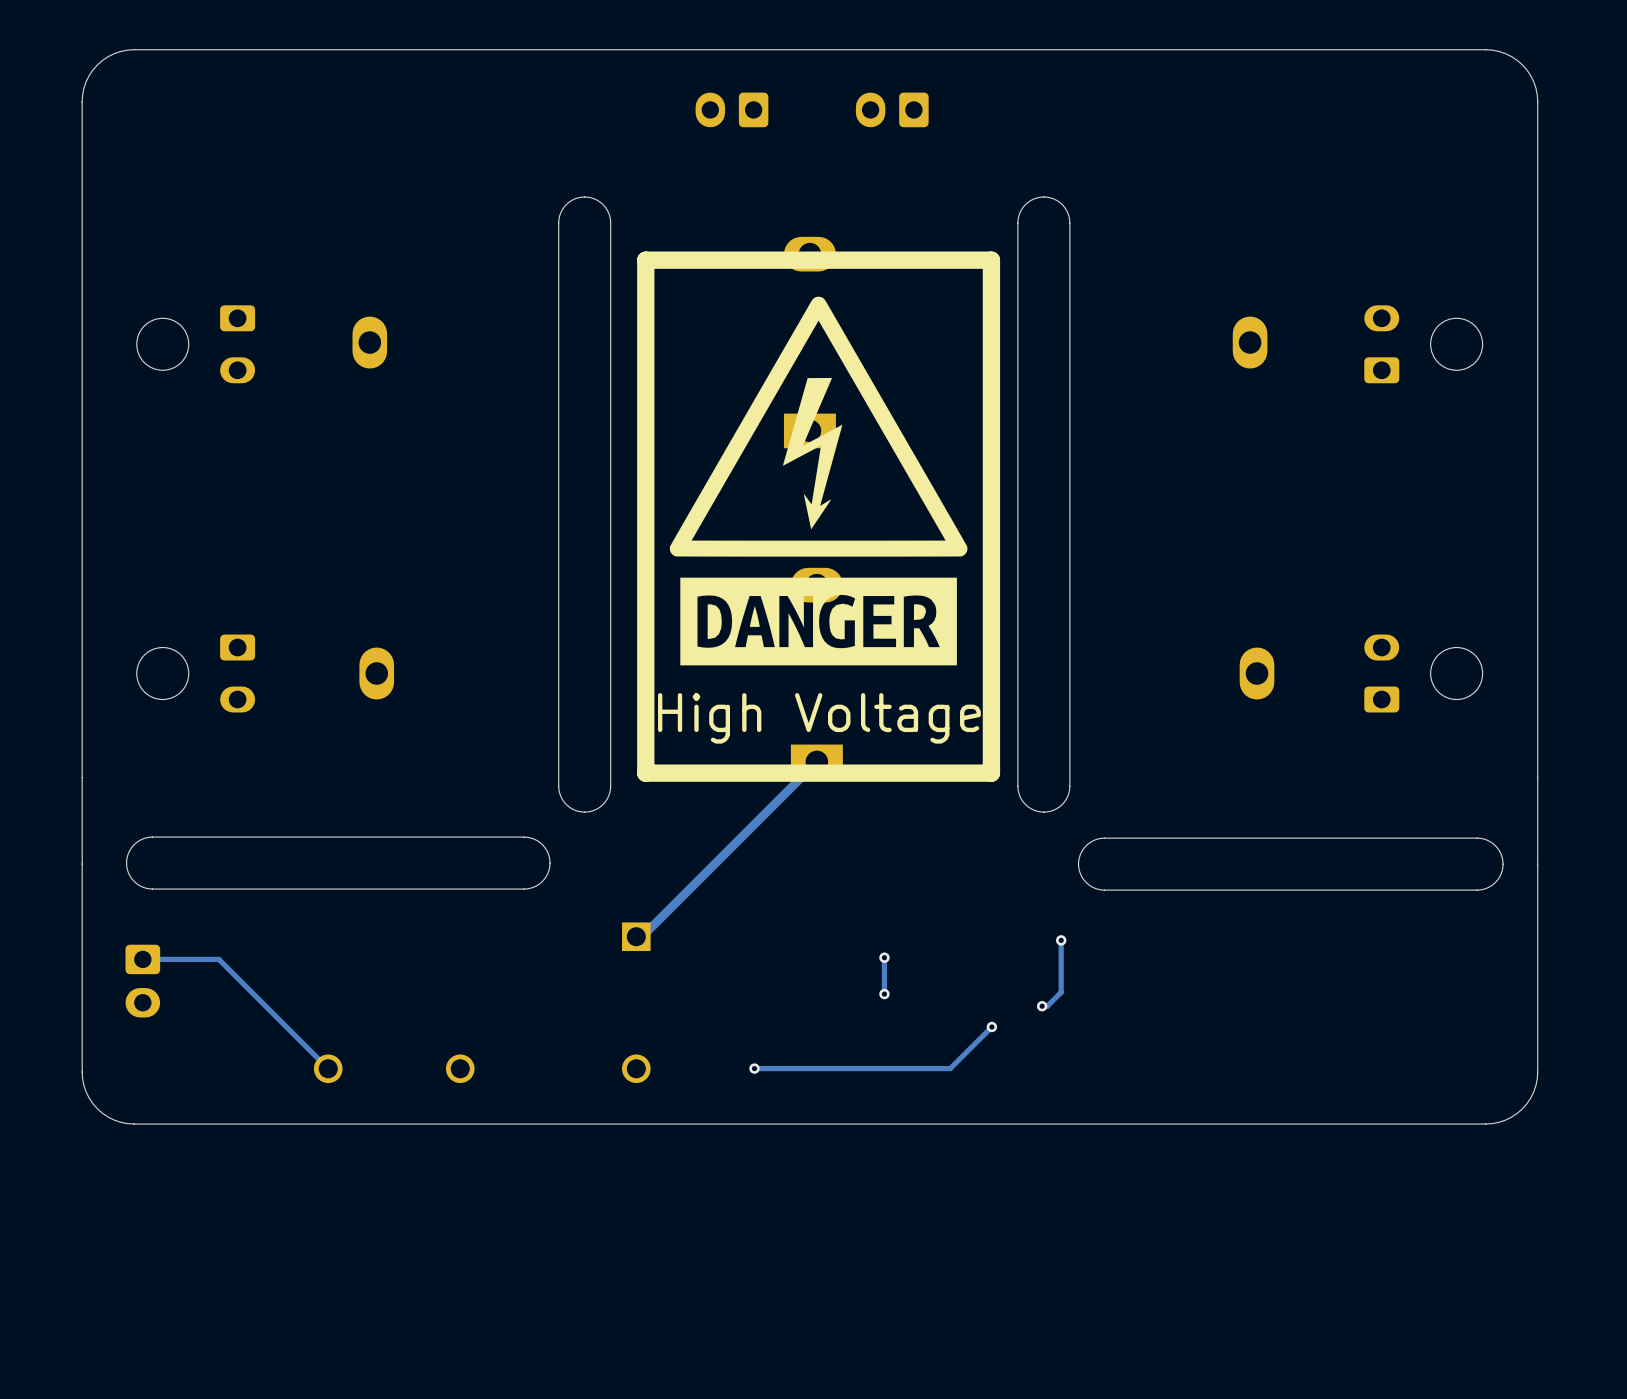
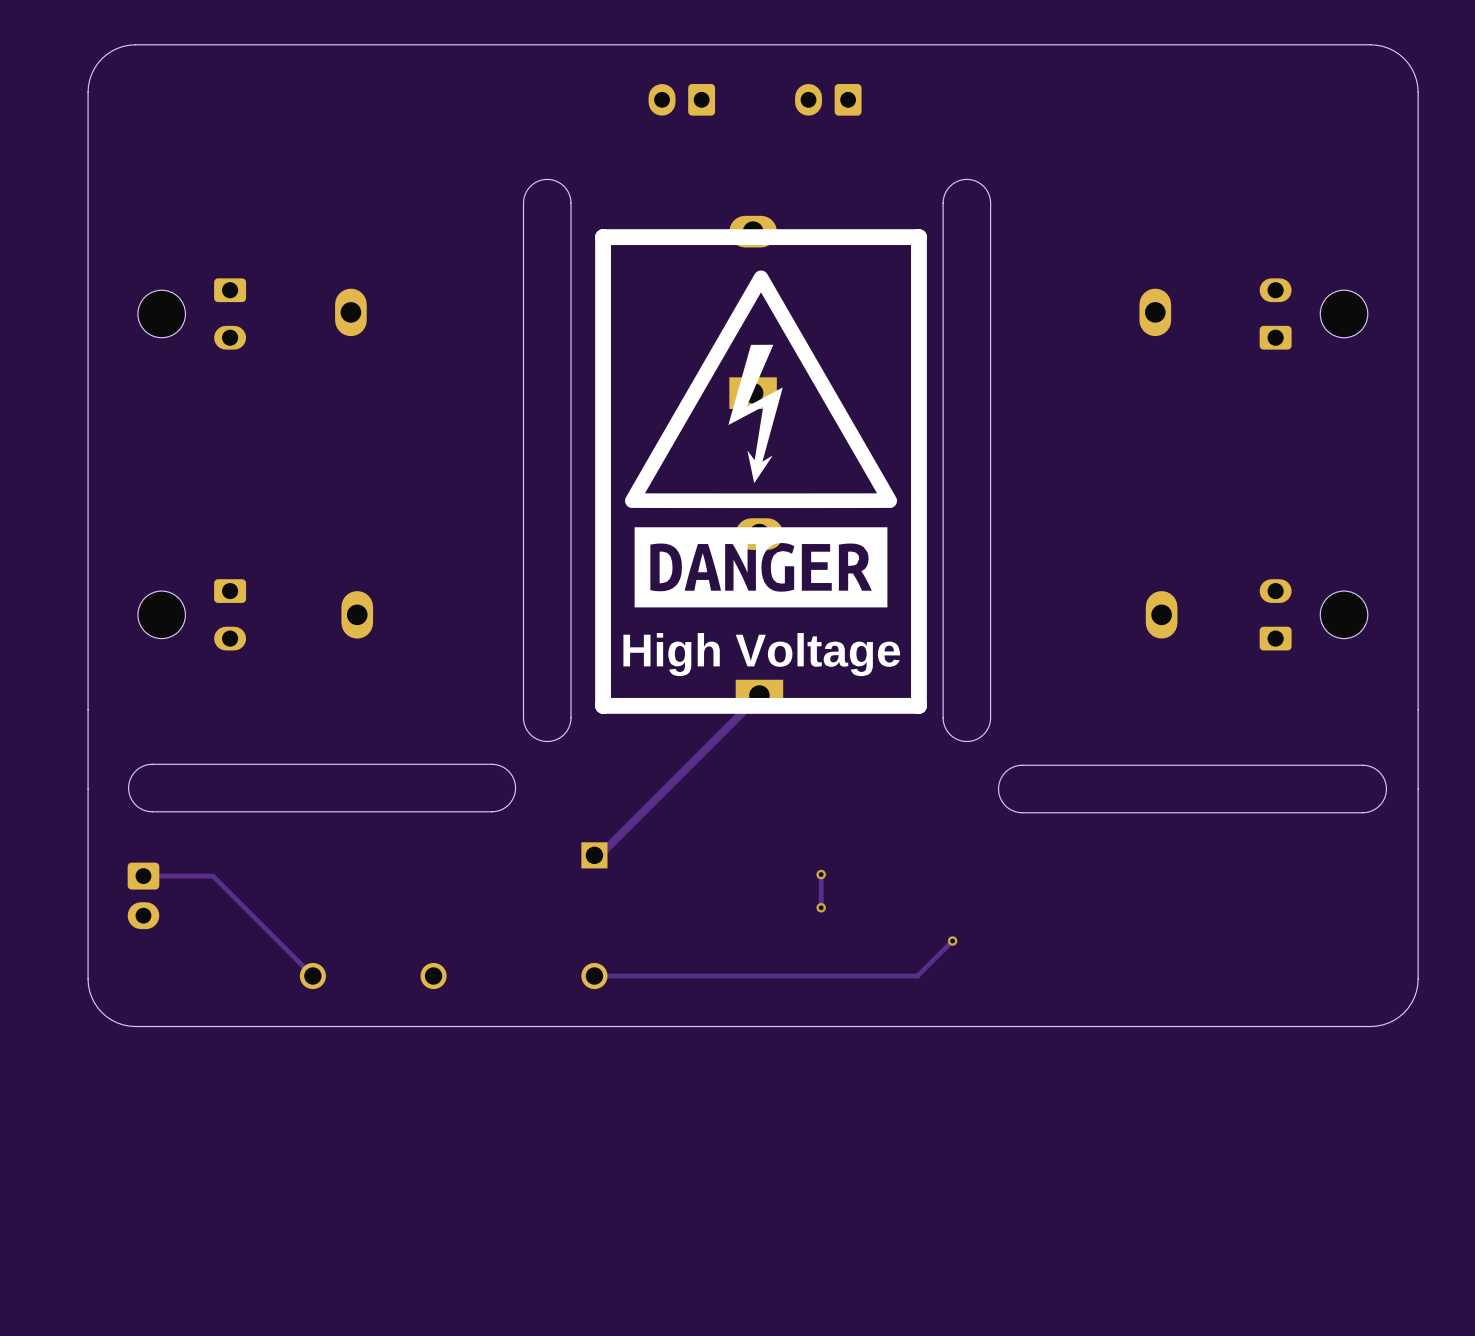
track: (1061, 940) (1061, 992) (1047, 1006) (1042, 1006) -> none
via: (1061, 940) -> none
via: (1042, 1006) -> none
track: (991, 1027) (950, 1068) (754, 1068) -> none
via: (991, 1027) -> none
track: none -> (952, 941) (917, 976) (594, 976)
via: none -> (952, 941)
via: (754, 1068) -> none

